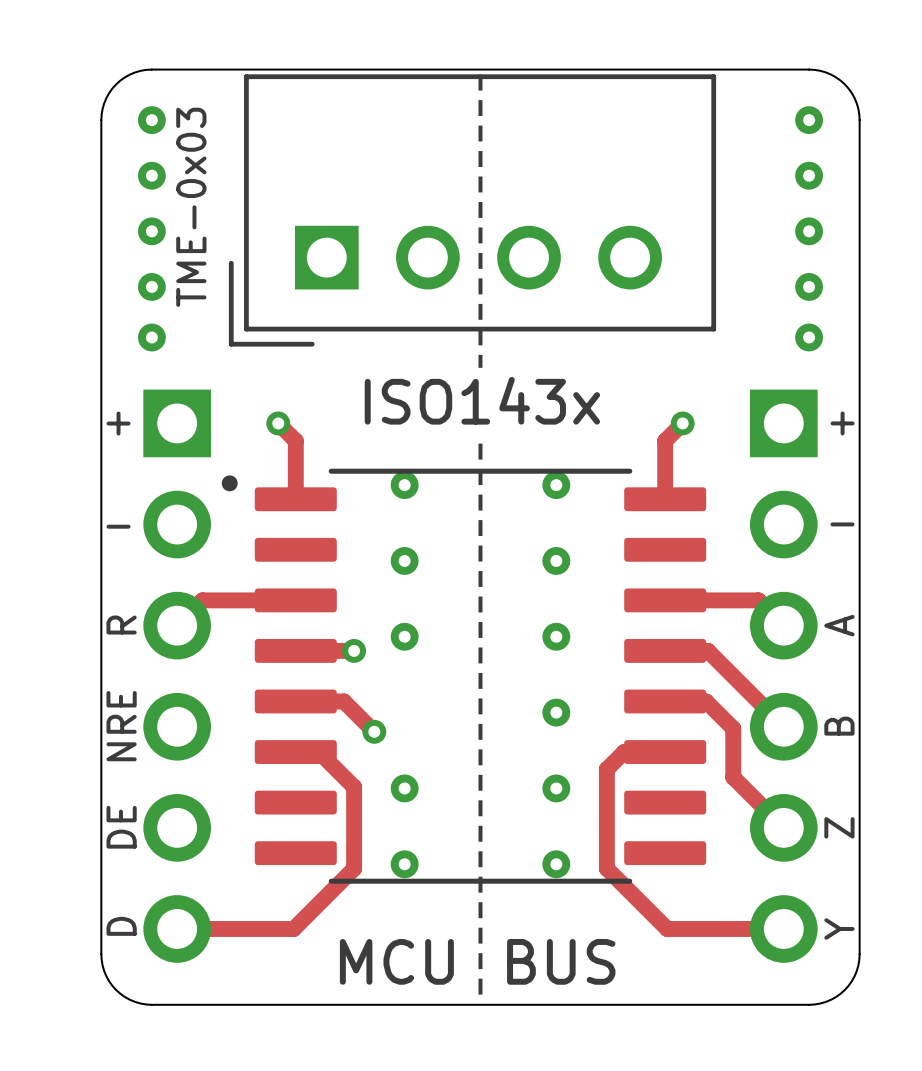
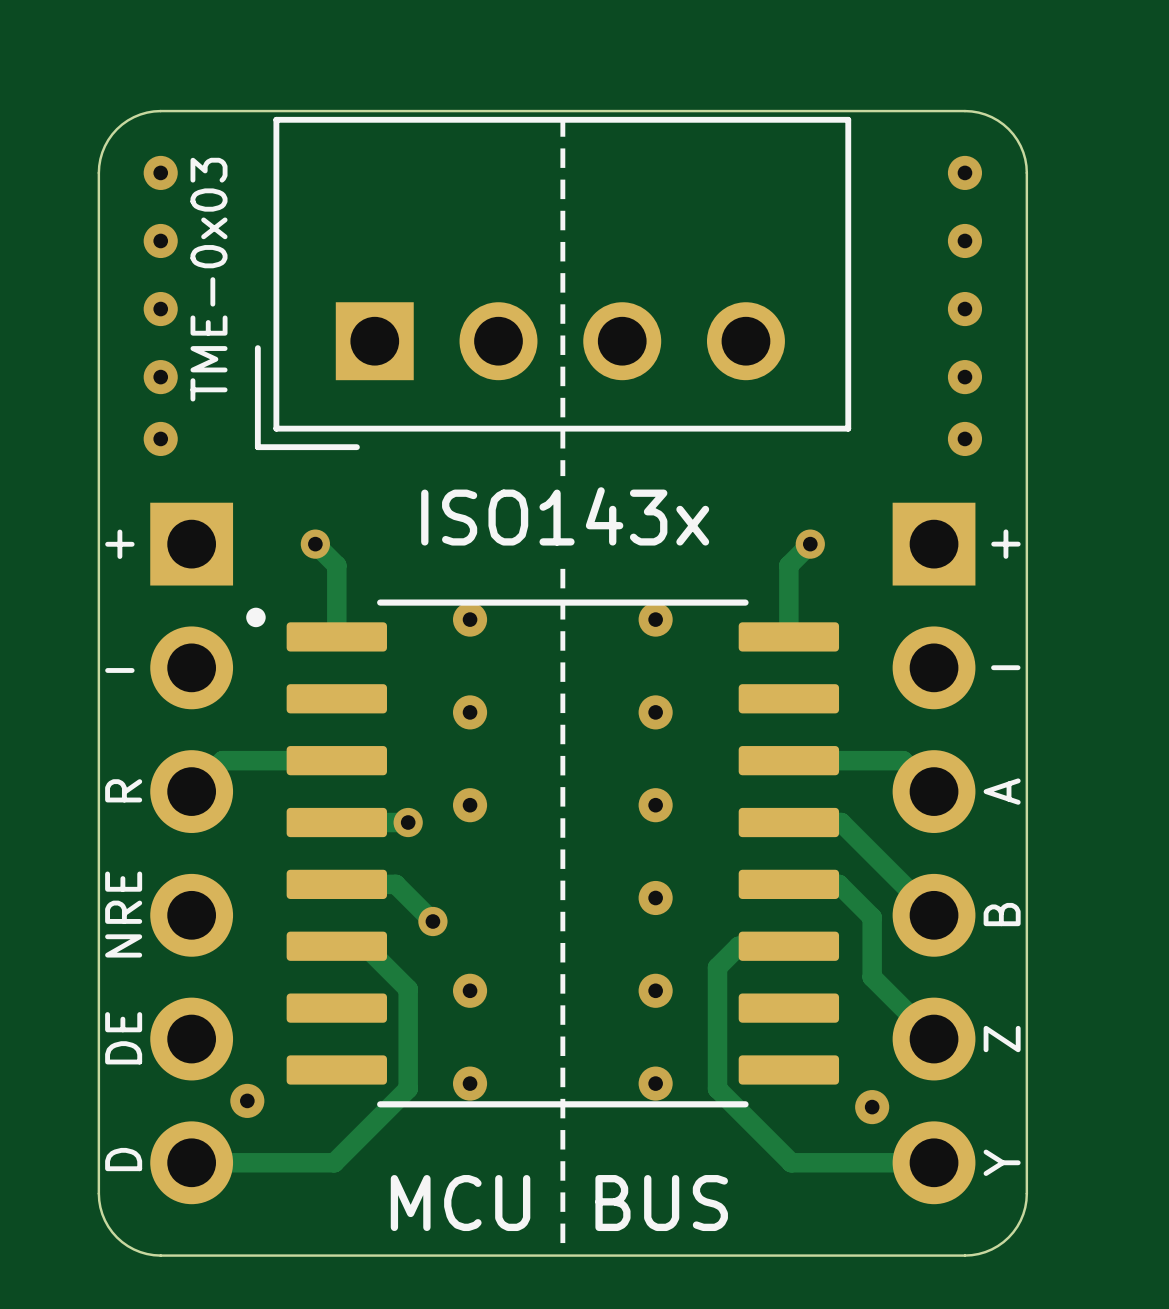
via: none -> (247, 1100)
via: none -> (872, 1107)

